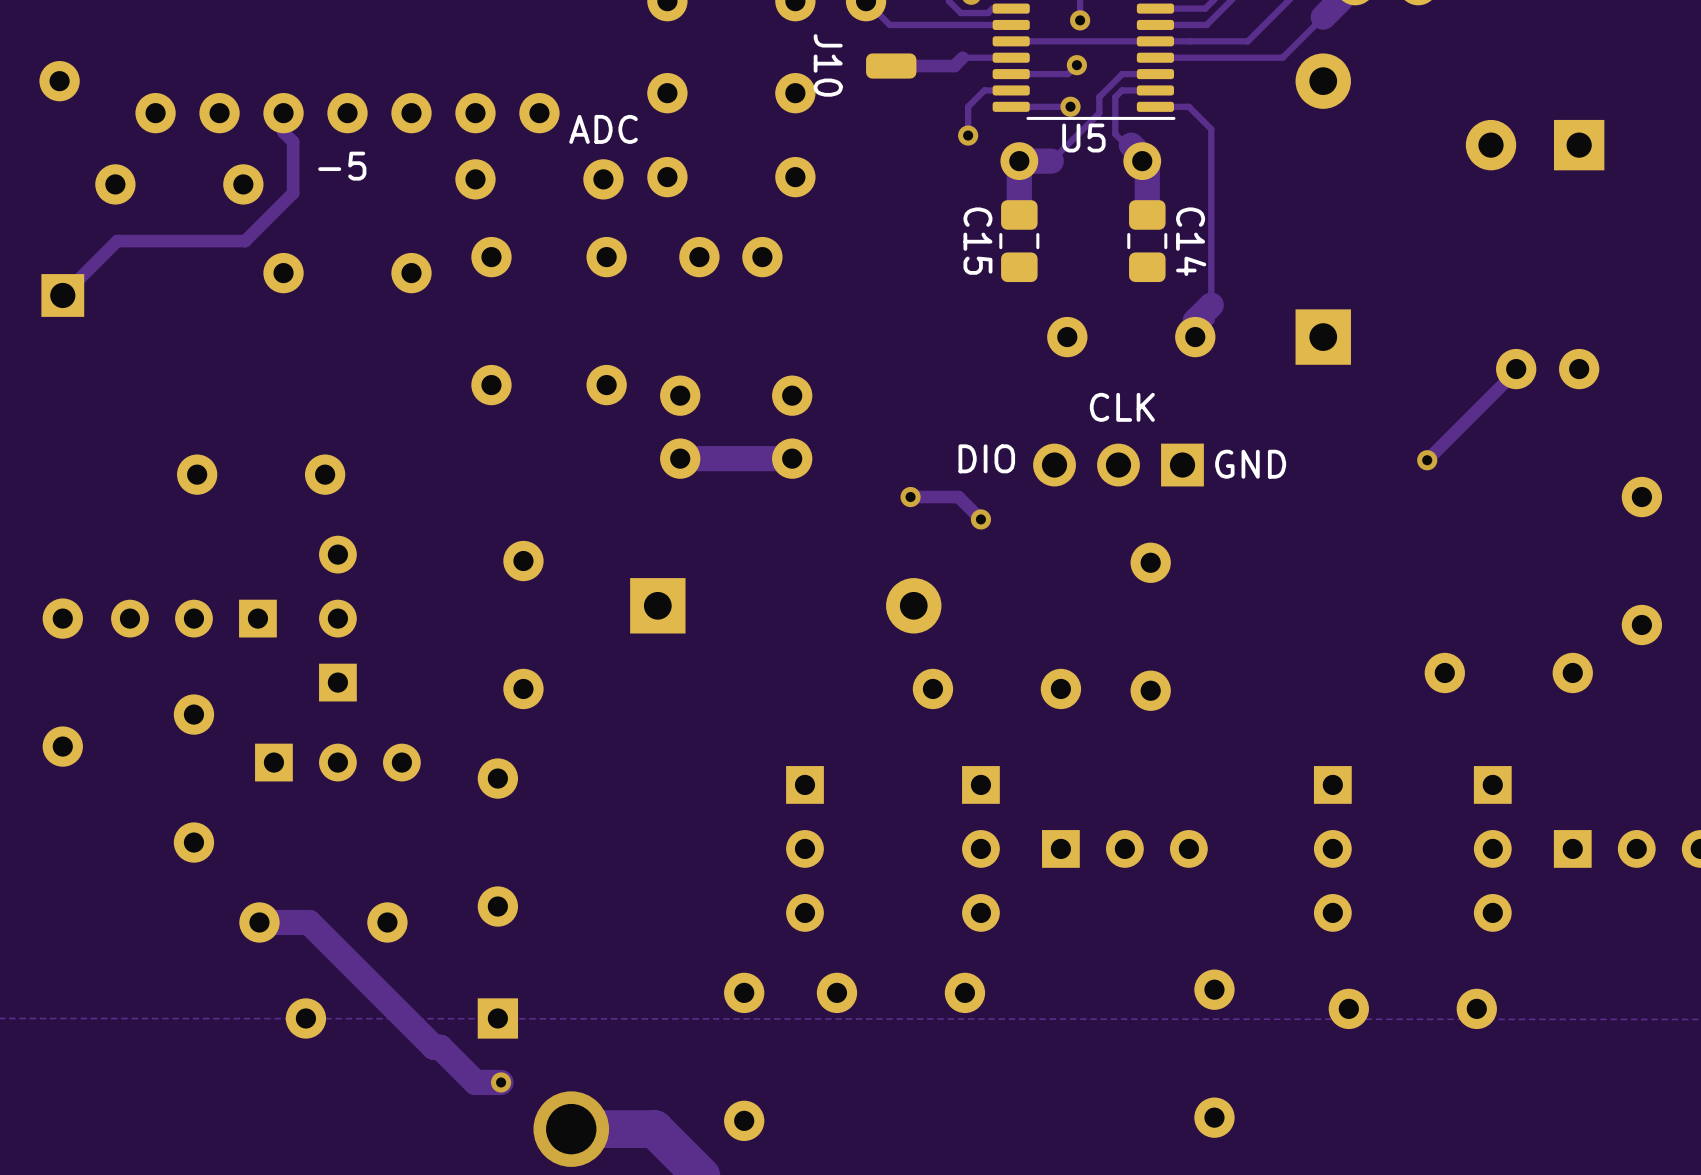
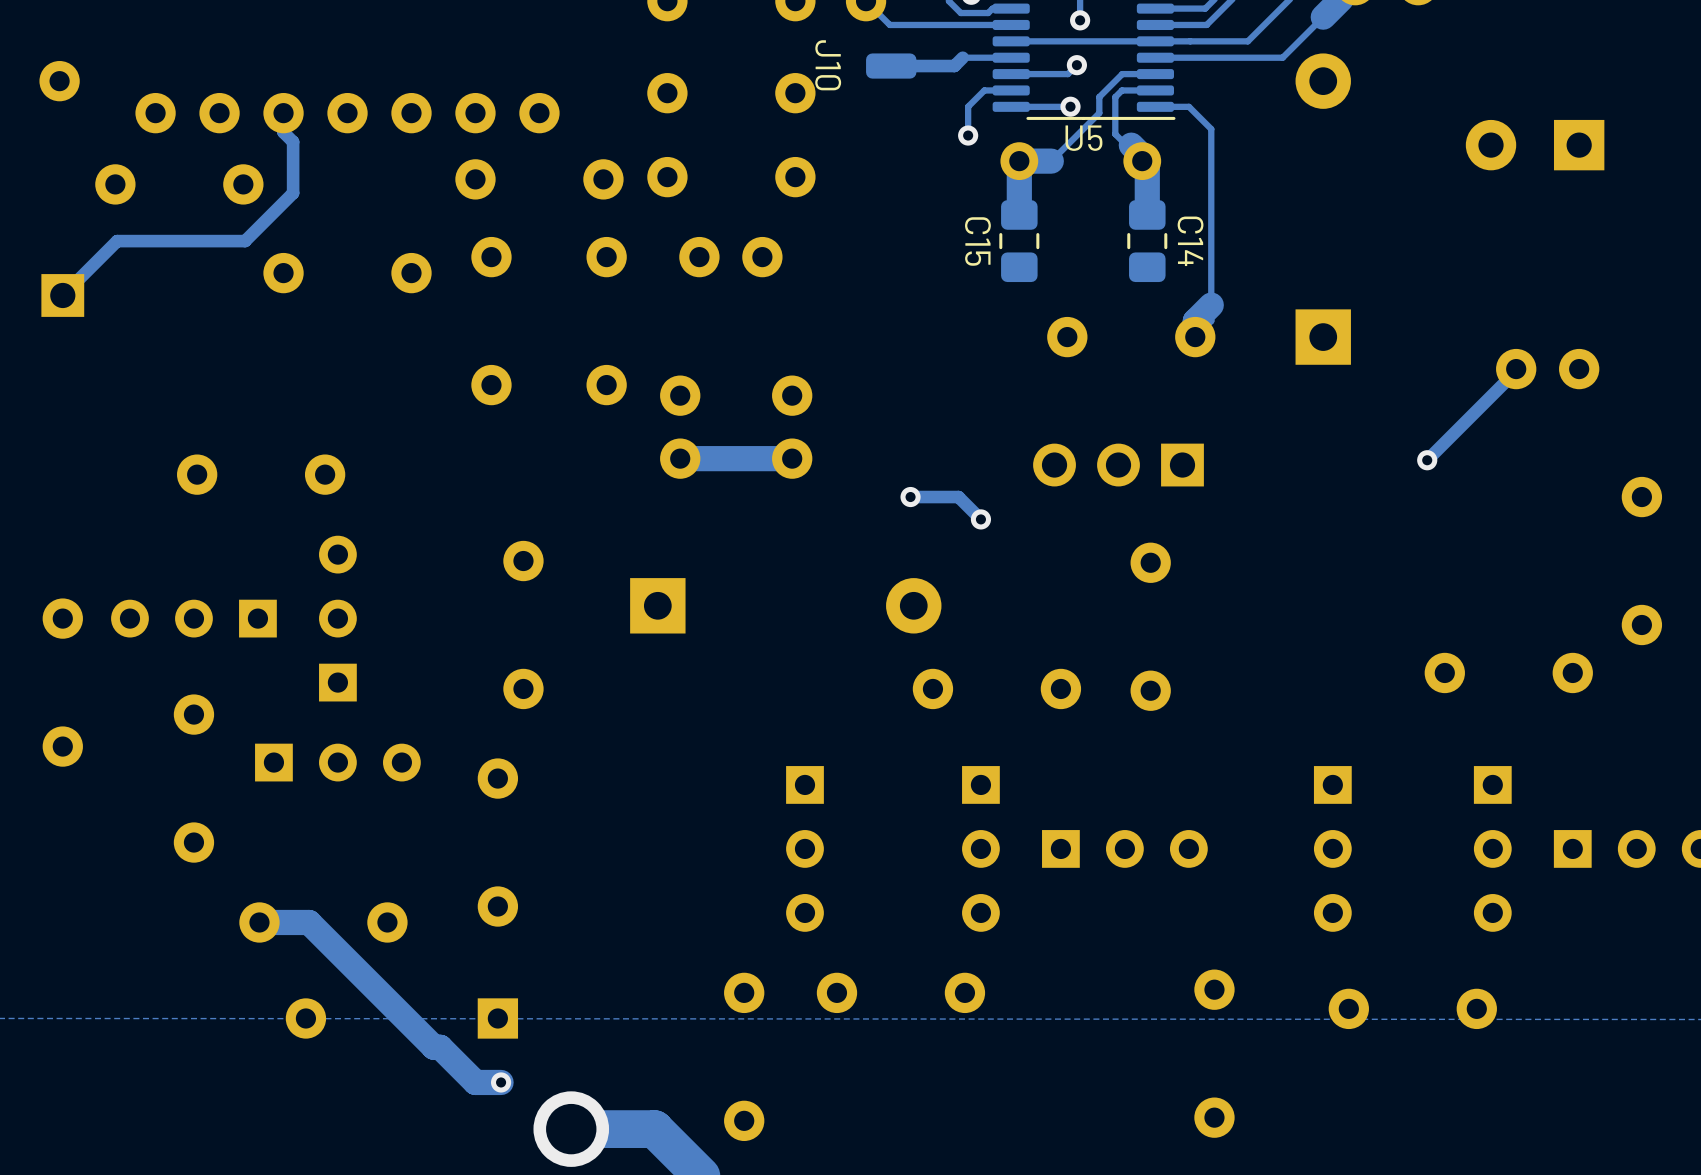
text: ADC (603, 129) -> none
text: -5 (342, 166) -> none
text: CLK (1122, 407) -> none
text: DIO (986, 458) -> none
text: GND (1250, 464) -> none

